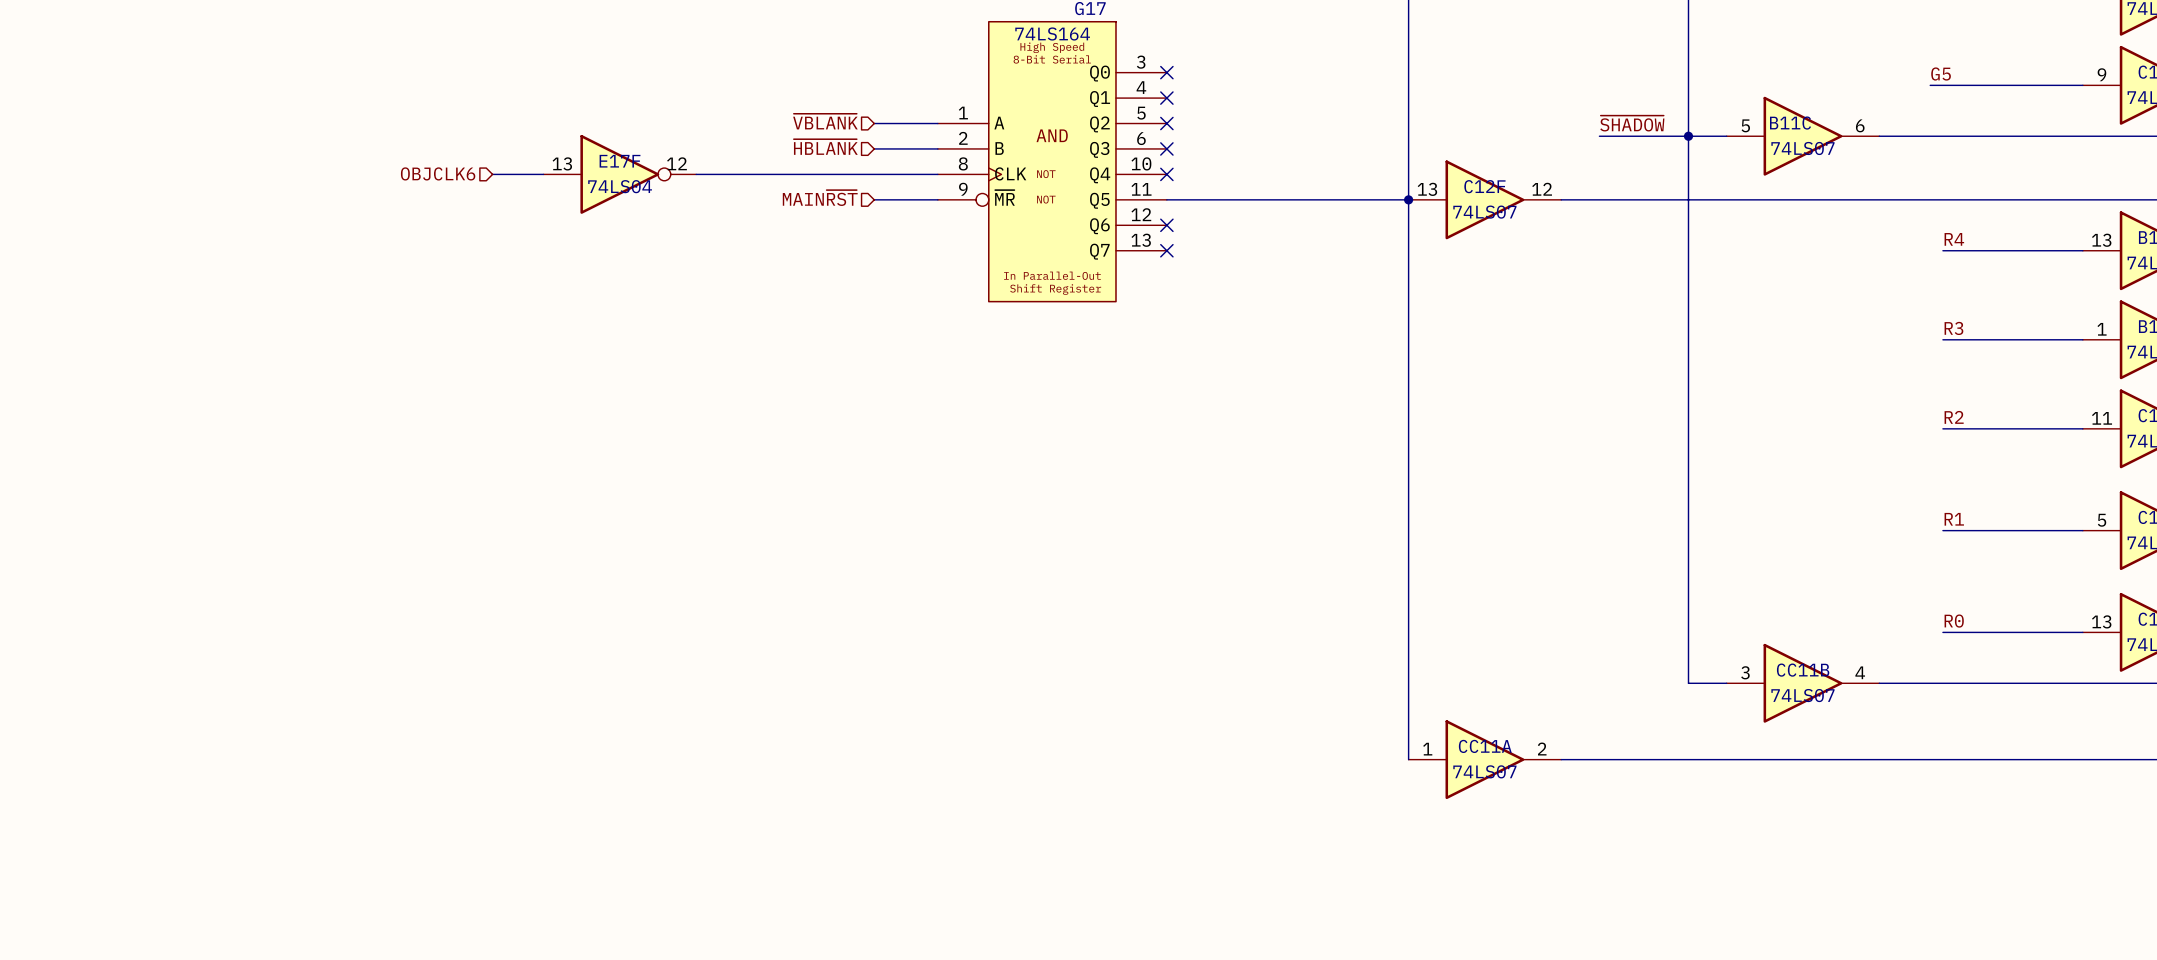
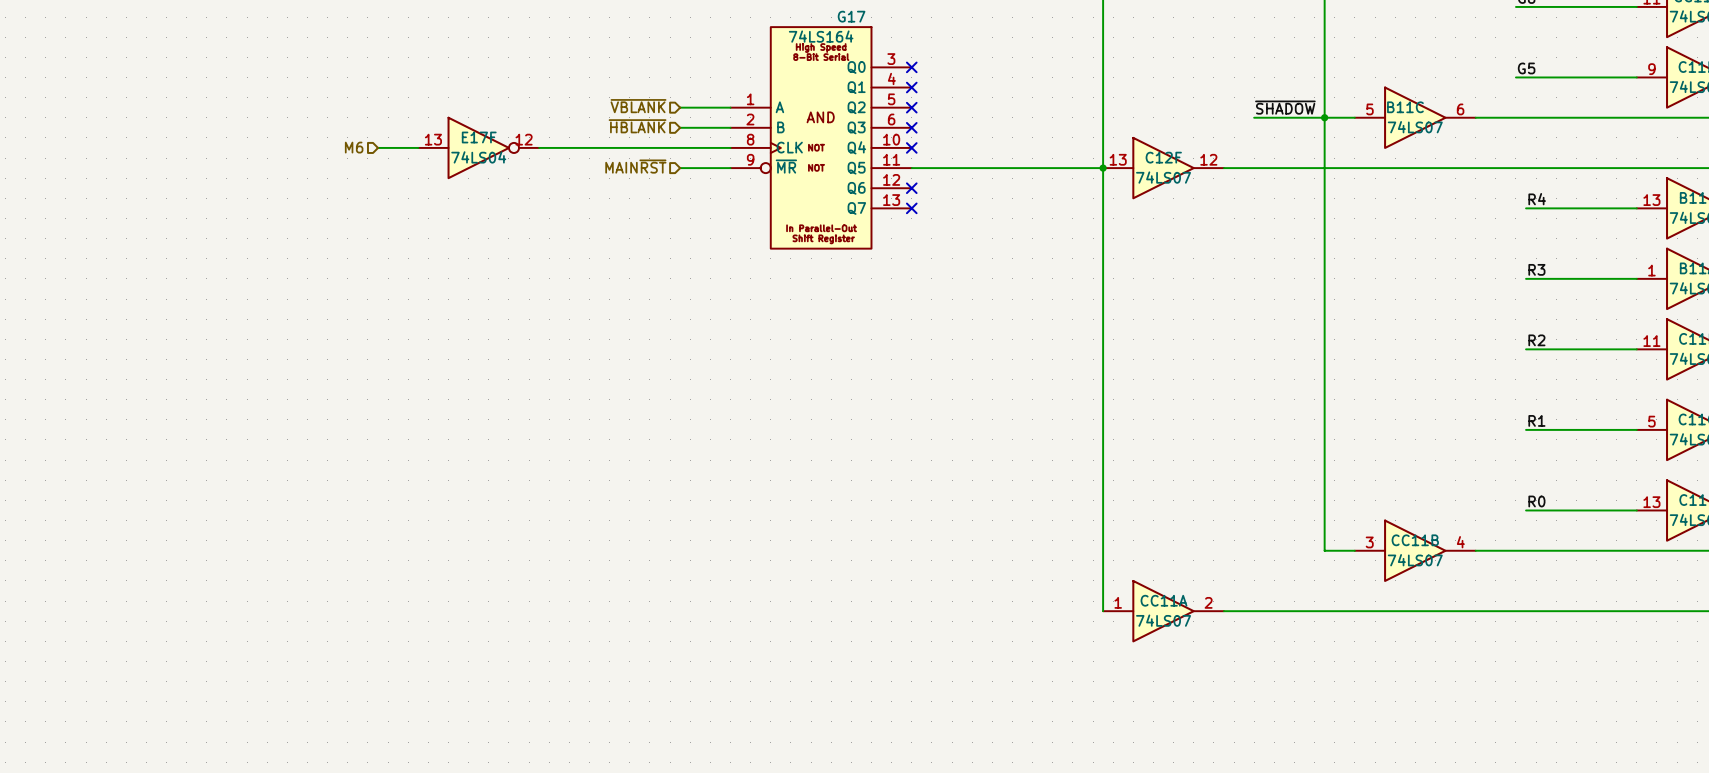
hierarchical label: OBJCLK6 (438, 173) -> M6 (354, 147)

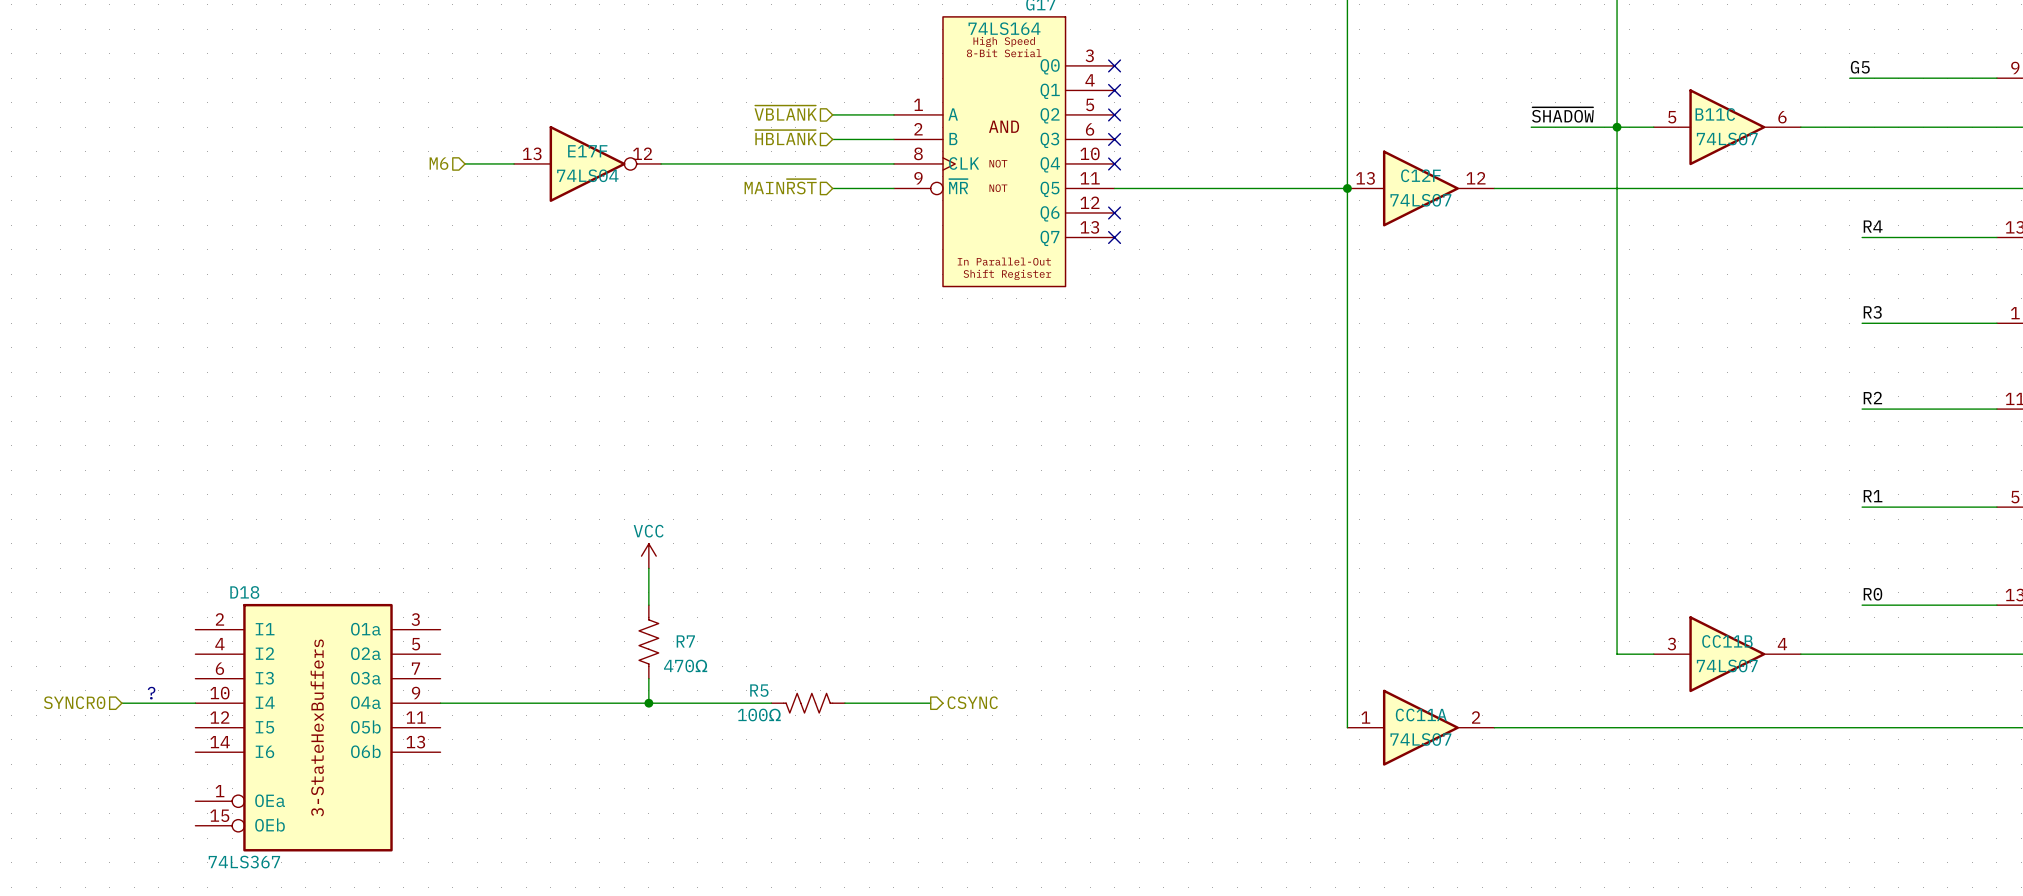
power symbol: none -> VCC (648, 556)
wire: none -> (648, 568) (648, 605)
R7: none -> 470Ω (648, 641)
wire: none -> (648, 678) (648, 703)
text: none -> ? (151, 693)
hierarchical label: none -> SYNCR0 (74, 702)
hierarchical label: none -> CSYNC (972, 702)
wire: none -> (121, 703) (195, 703)
wire: none -> (440, 703) (771, 703)
junction: none -> (648, 703)
R5: none -> 100Ω (808, 703)
wire: none -> (844, 703) (930, 703)
D18: none -> 74LS367 (317, 727)

